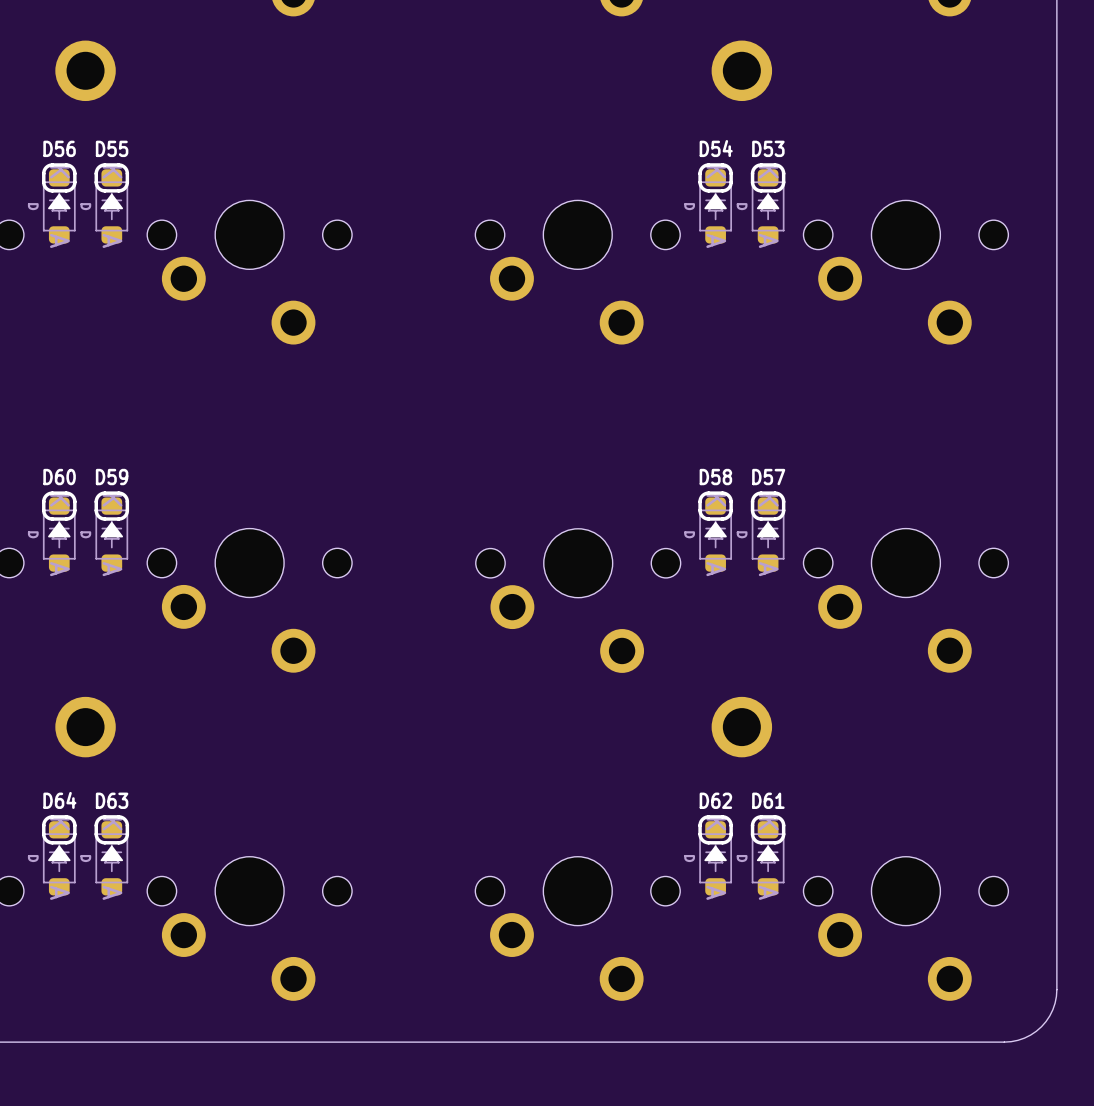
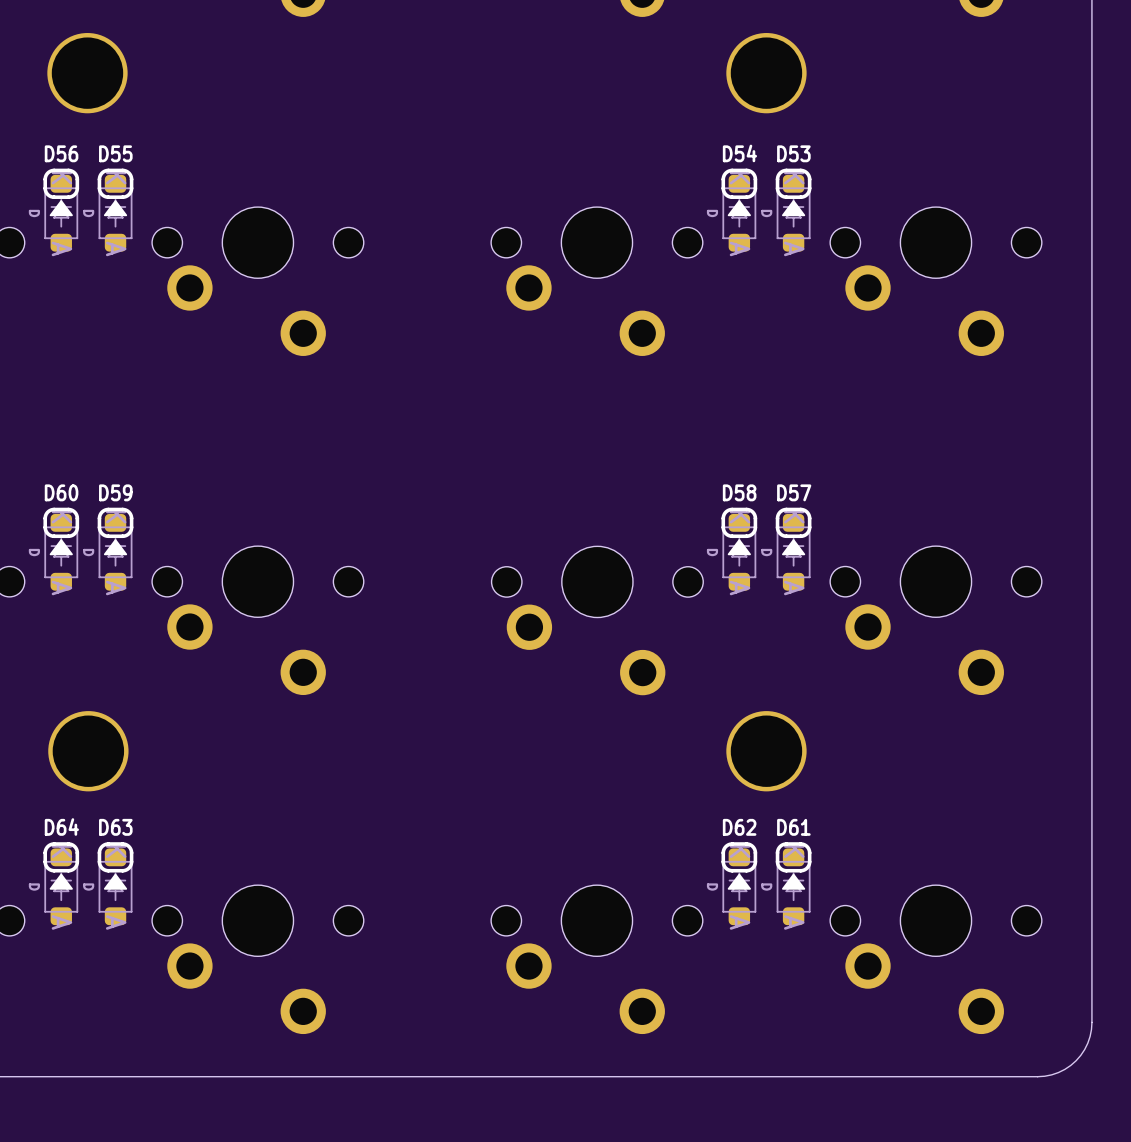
part footprint: [55, 40, 116, 102] -> [47, 33, 128, 114]
part footprint: [711, 40, 773, 102] -> [726, 33, 807, 114]
part footprint: [55, 696, 116, 758] -> [48, 711, 129, 792]
part footprint: [711, 696, 773, 758] -> [726, 711, 807, 792]

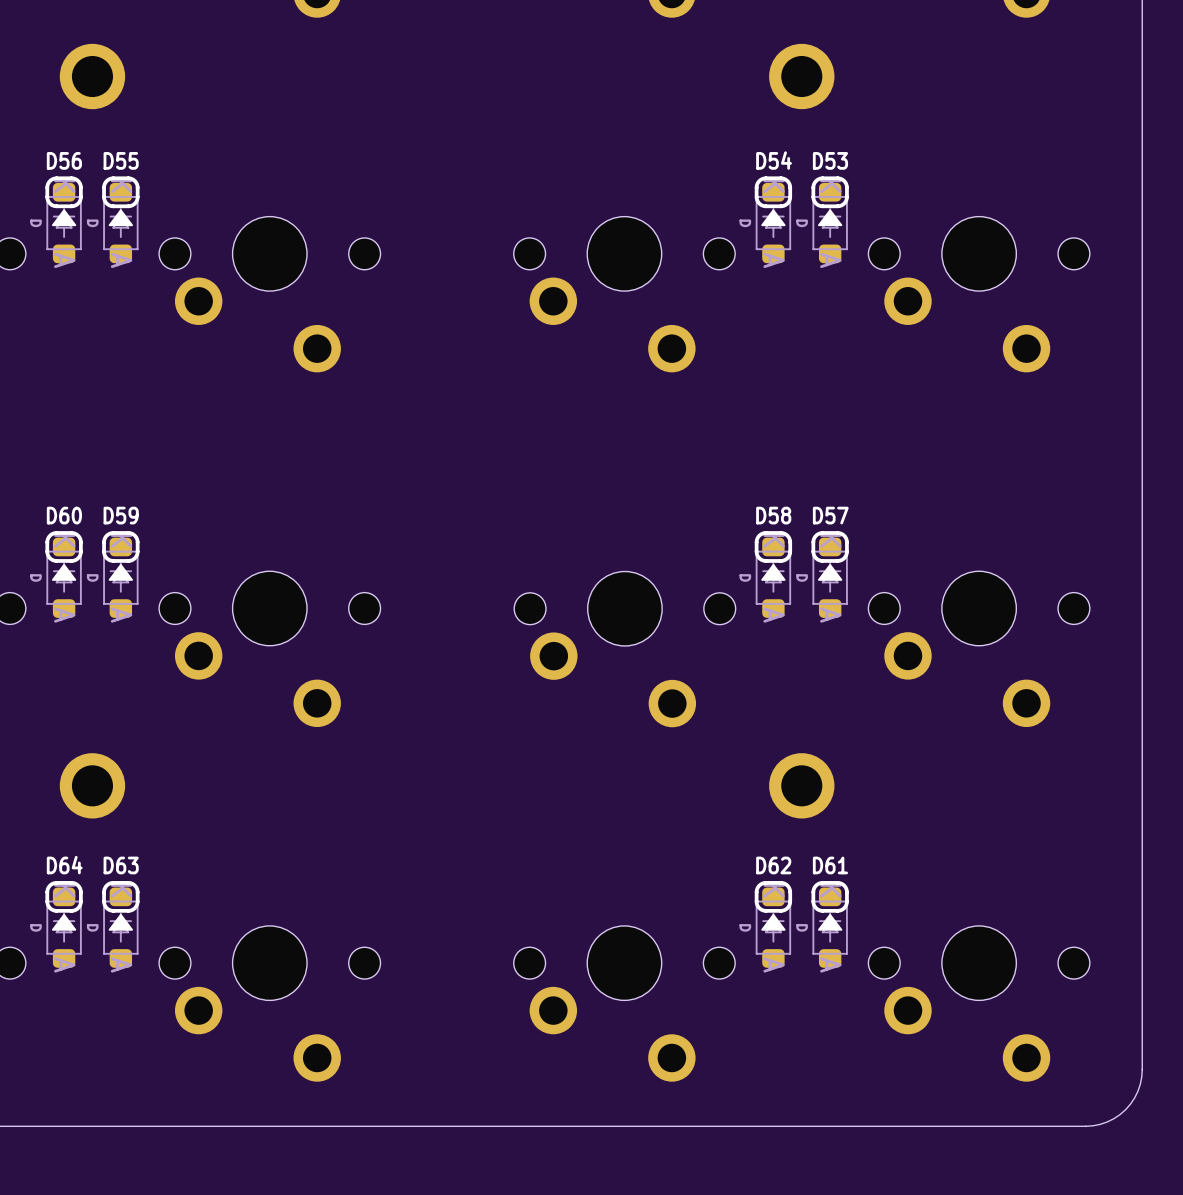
part footprint: [47, 33, 128, 114] -> [59, 43, 126, 110]
part footprint: [726, 33, 807, 114] -> [769, 43, 835, 110]
part footprint: [48, 711, 129, 792] -> [59, 753, 126, 819]
part footprint: [726, 711, 807, 792] -> [769, 753, 835, 819]

